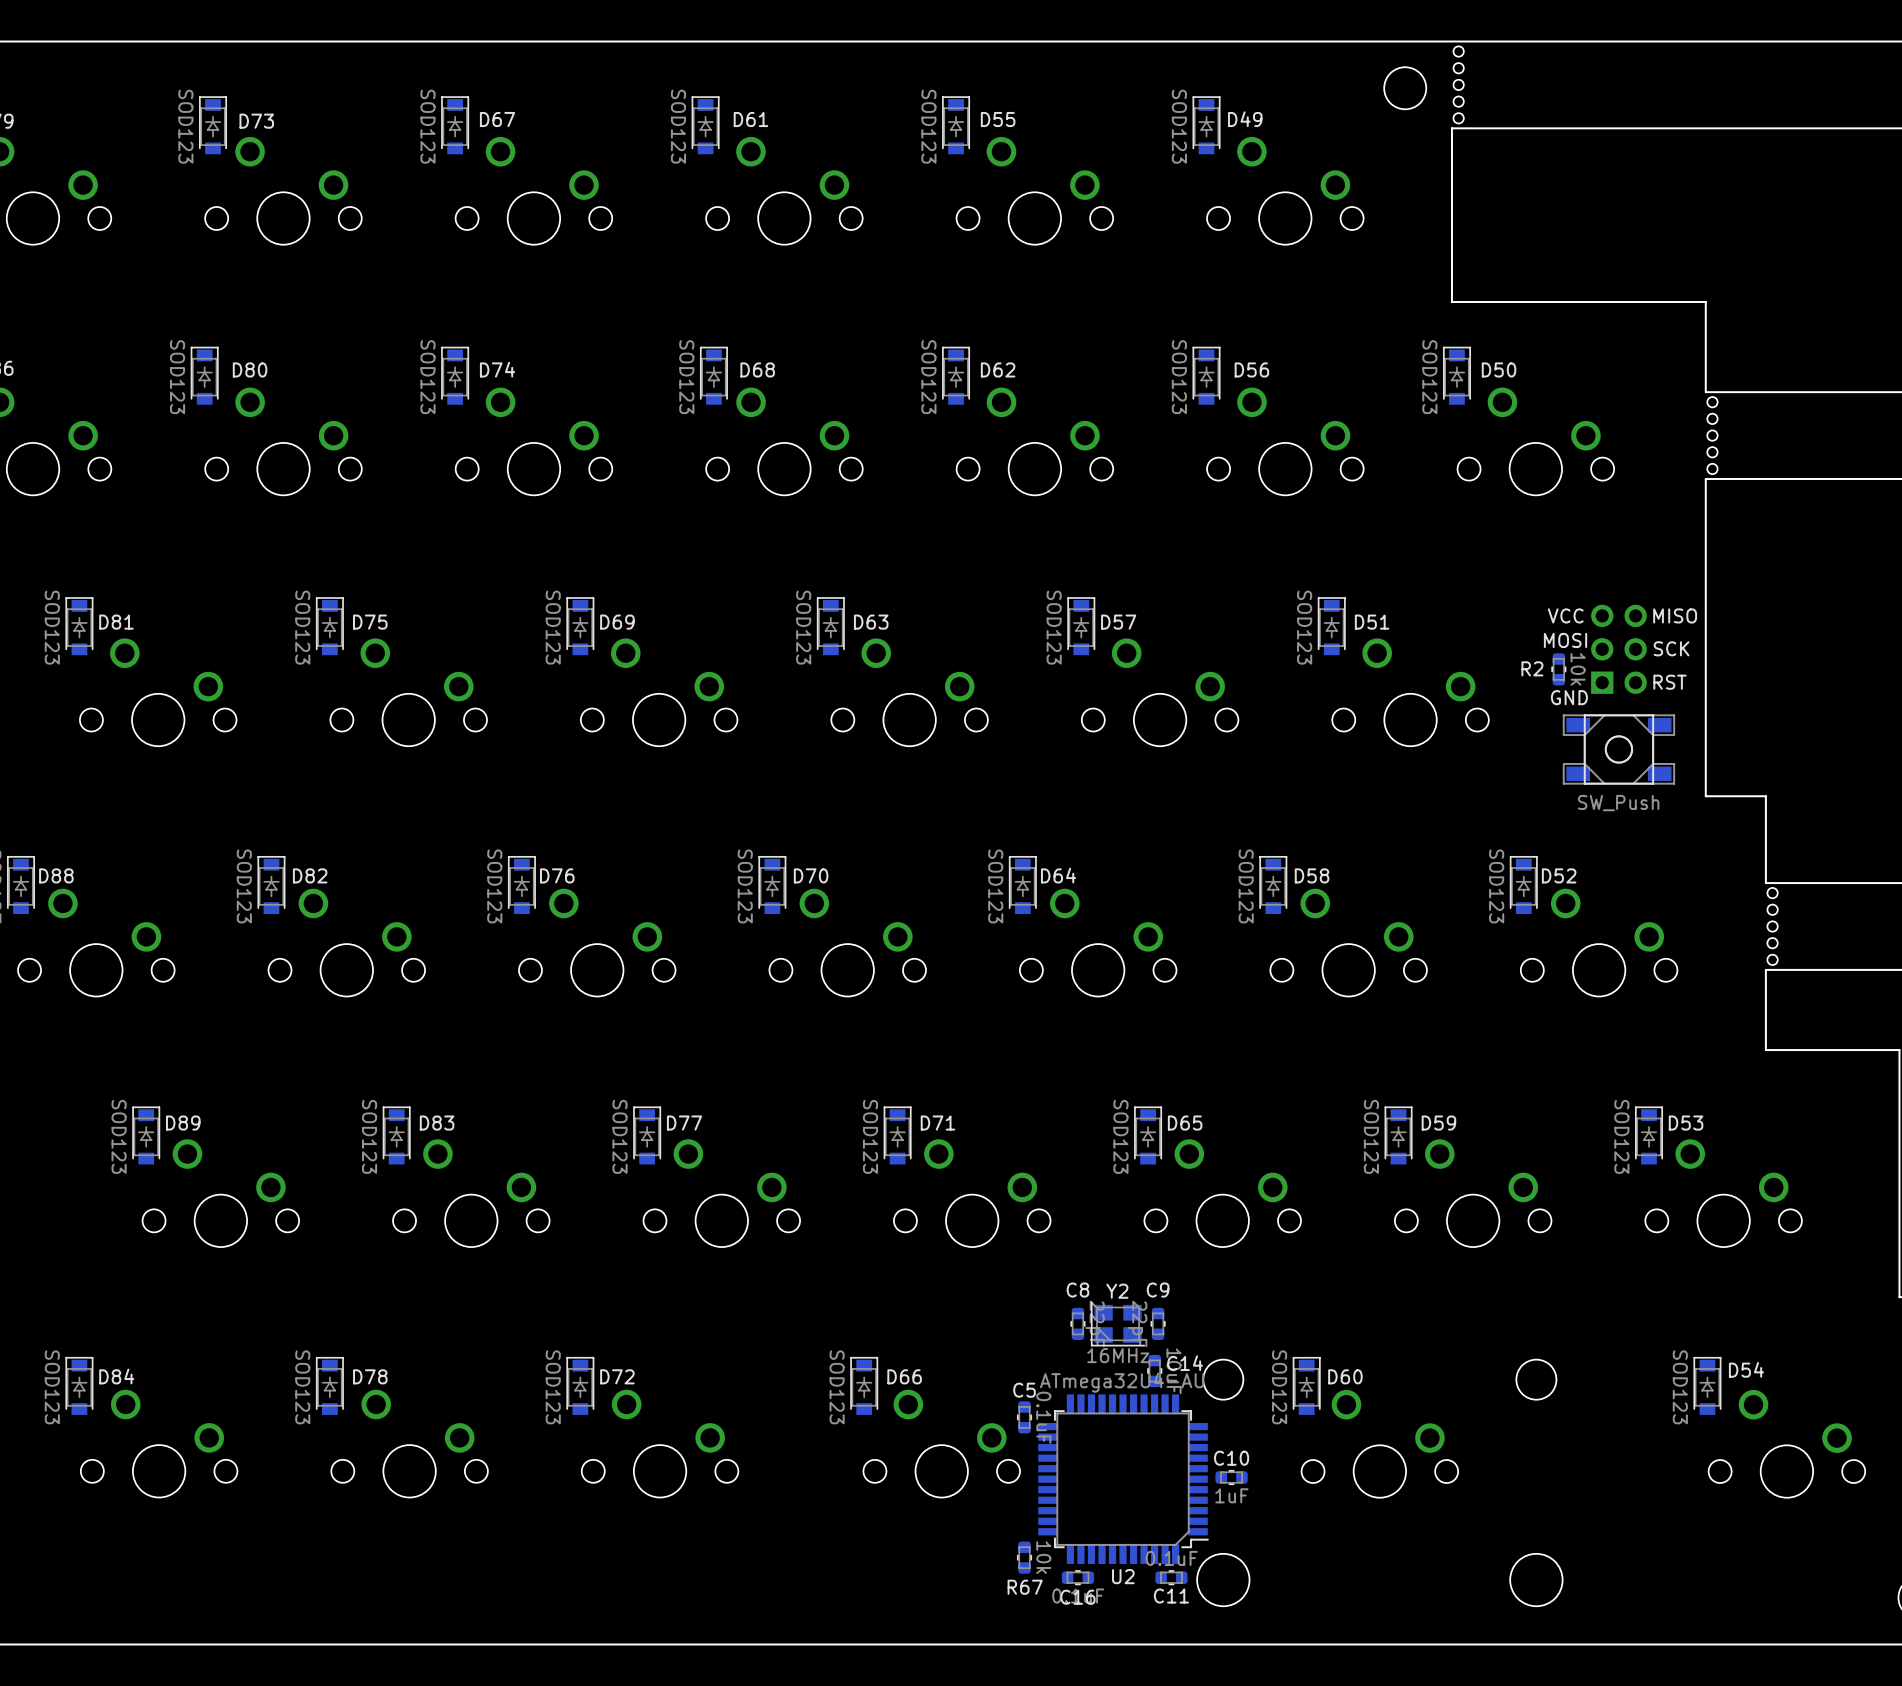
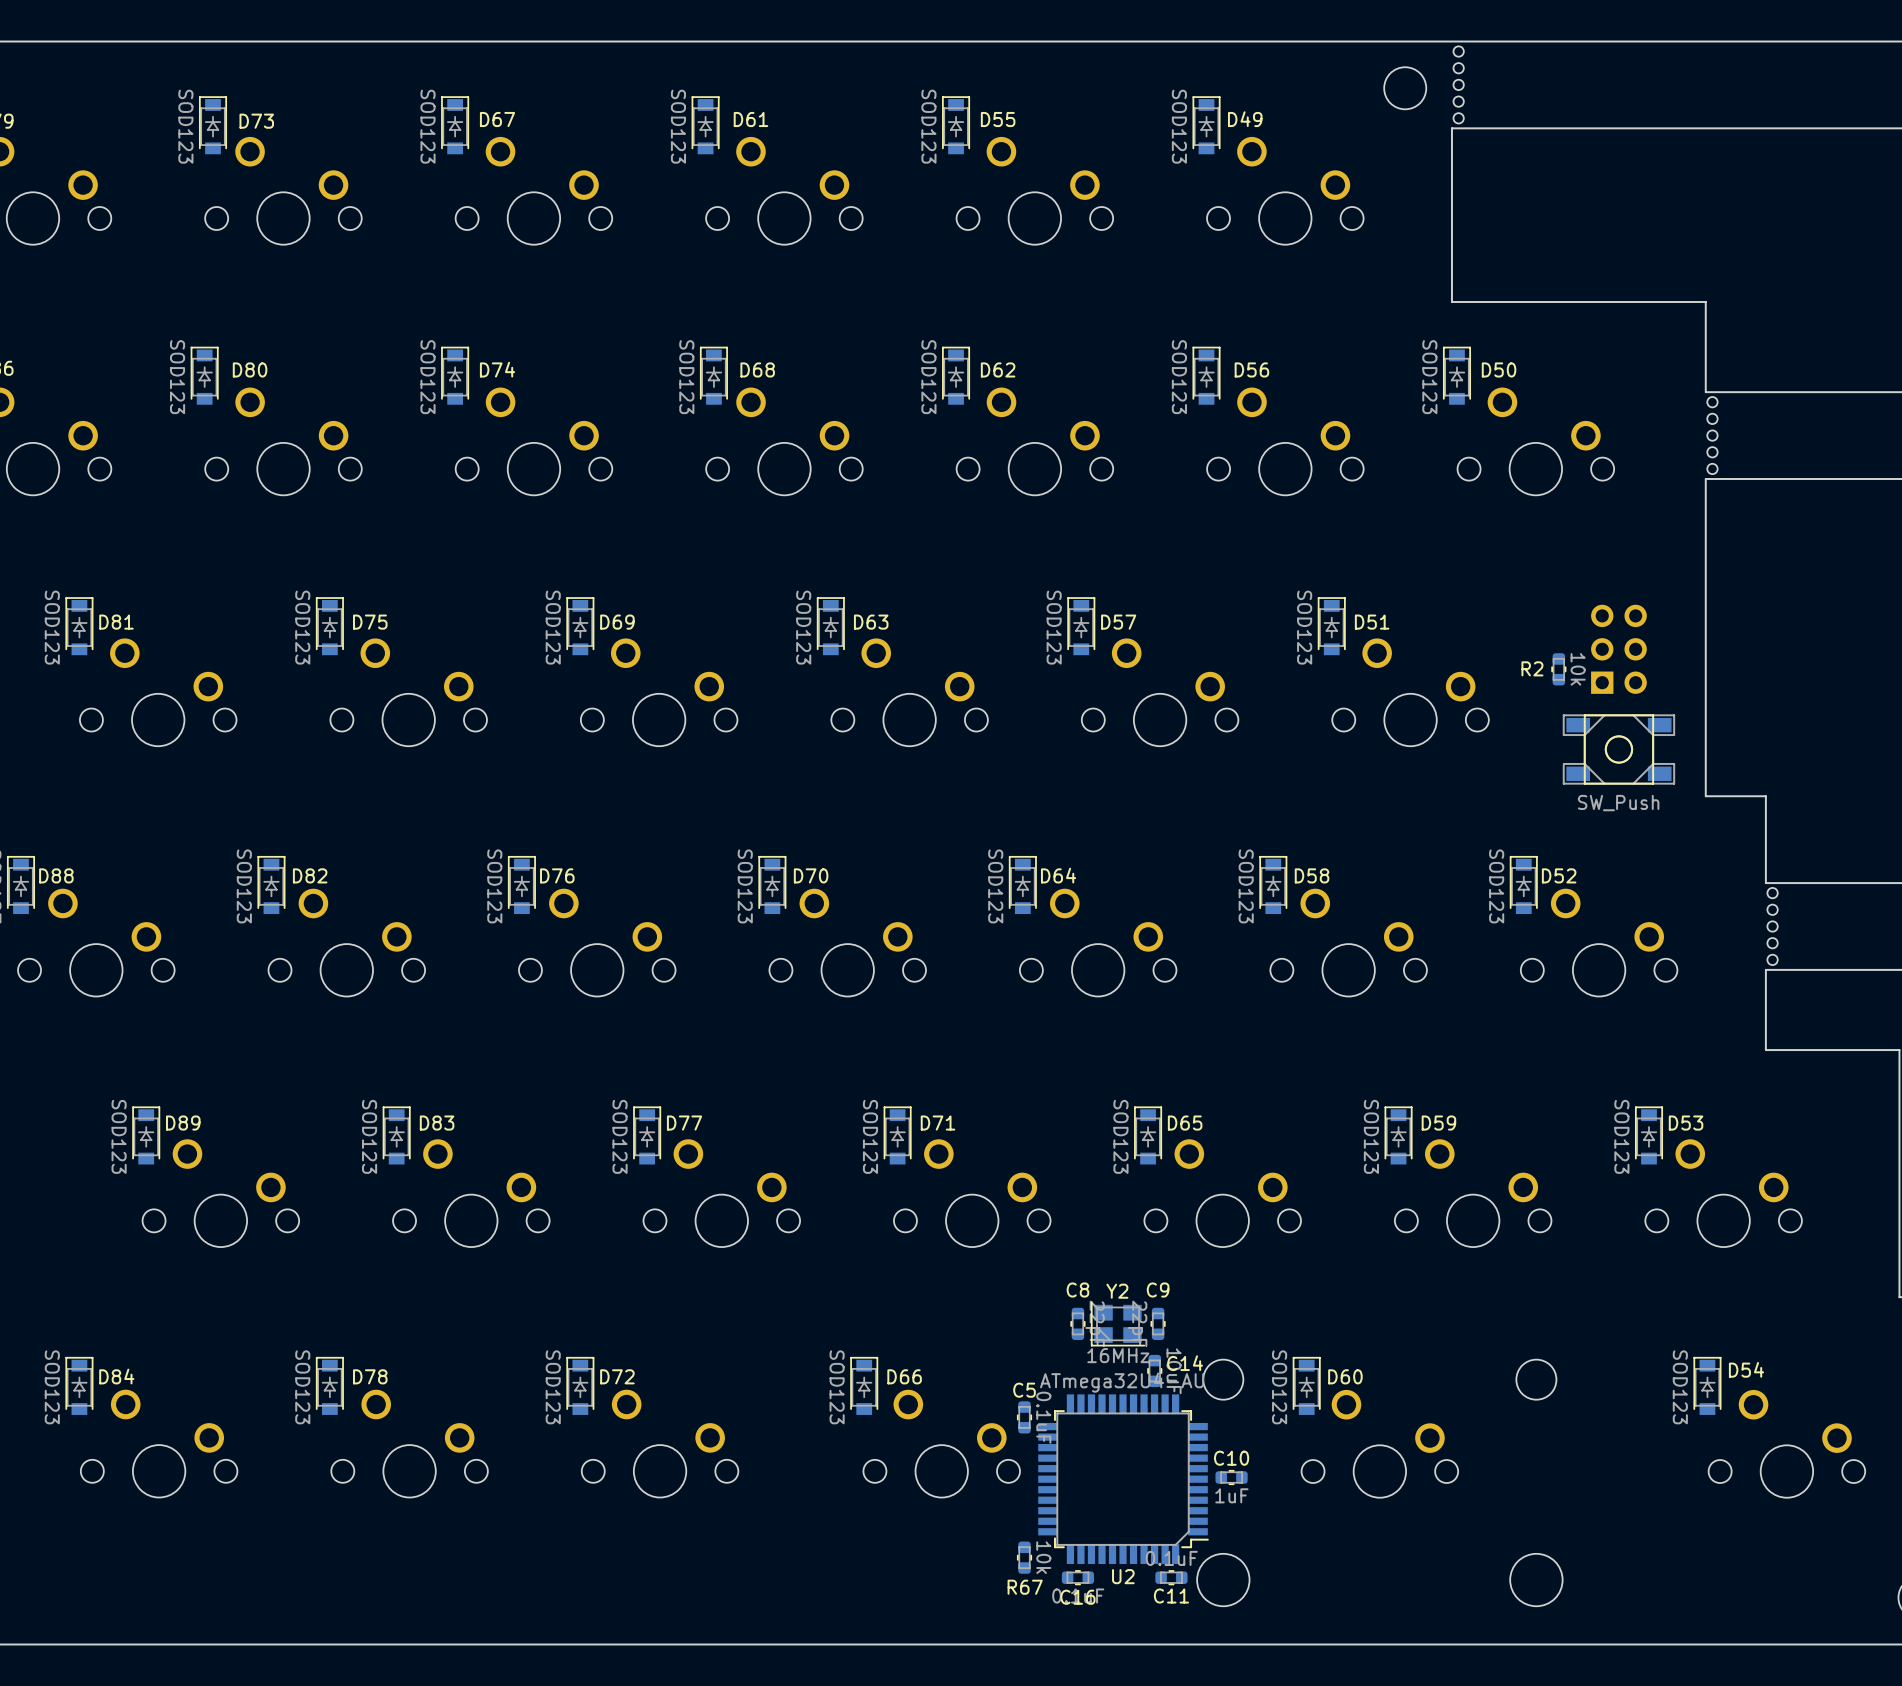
part text: VCC (1565, 615) -> none
part text: MISO (1675, 615) -> none
part text: MOSI (1565, 640) -> none
part text: SCK (1671, 648) -> none
part text: RST (1669, 682) -> none
part text: GND (1569, 697) -> none

